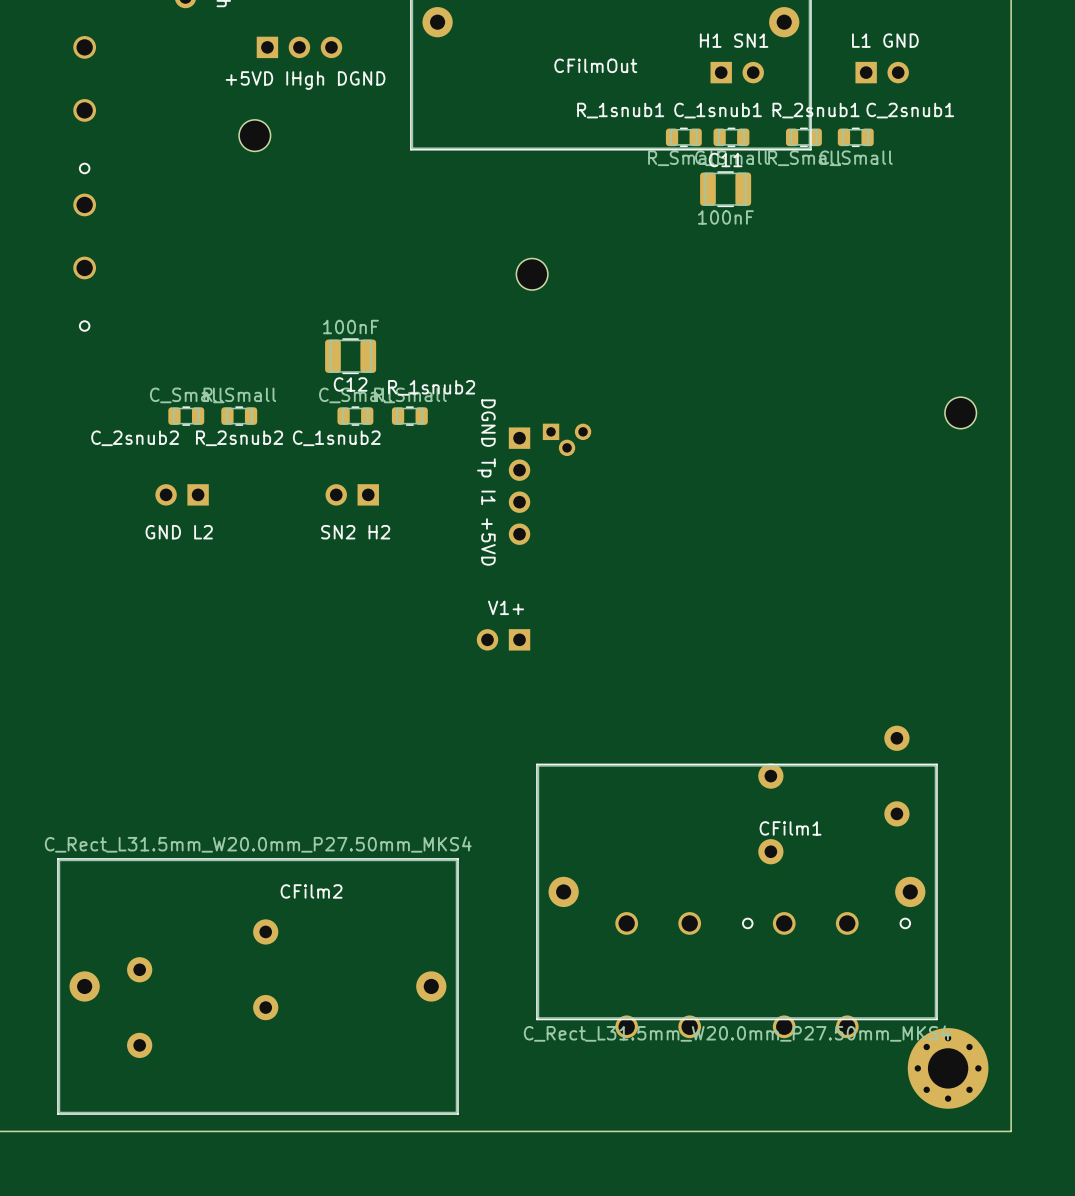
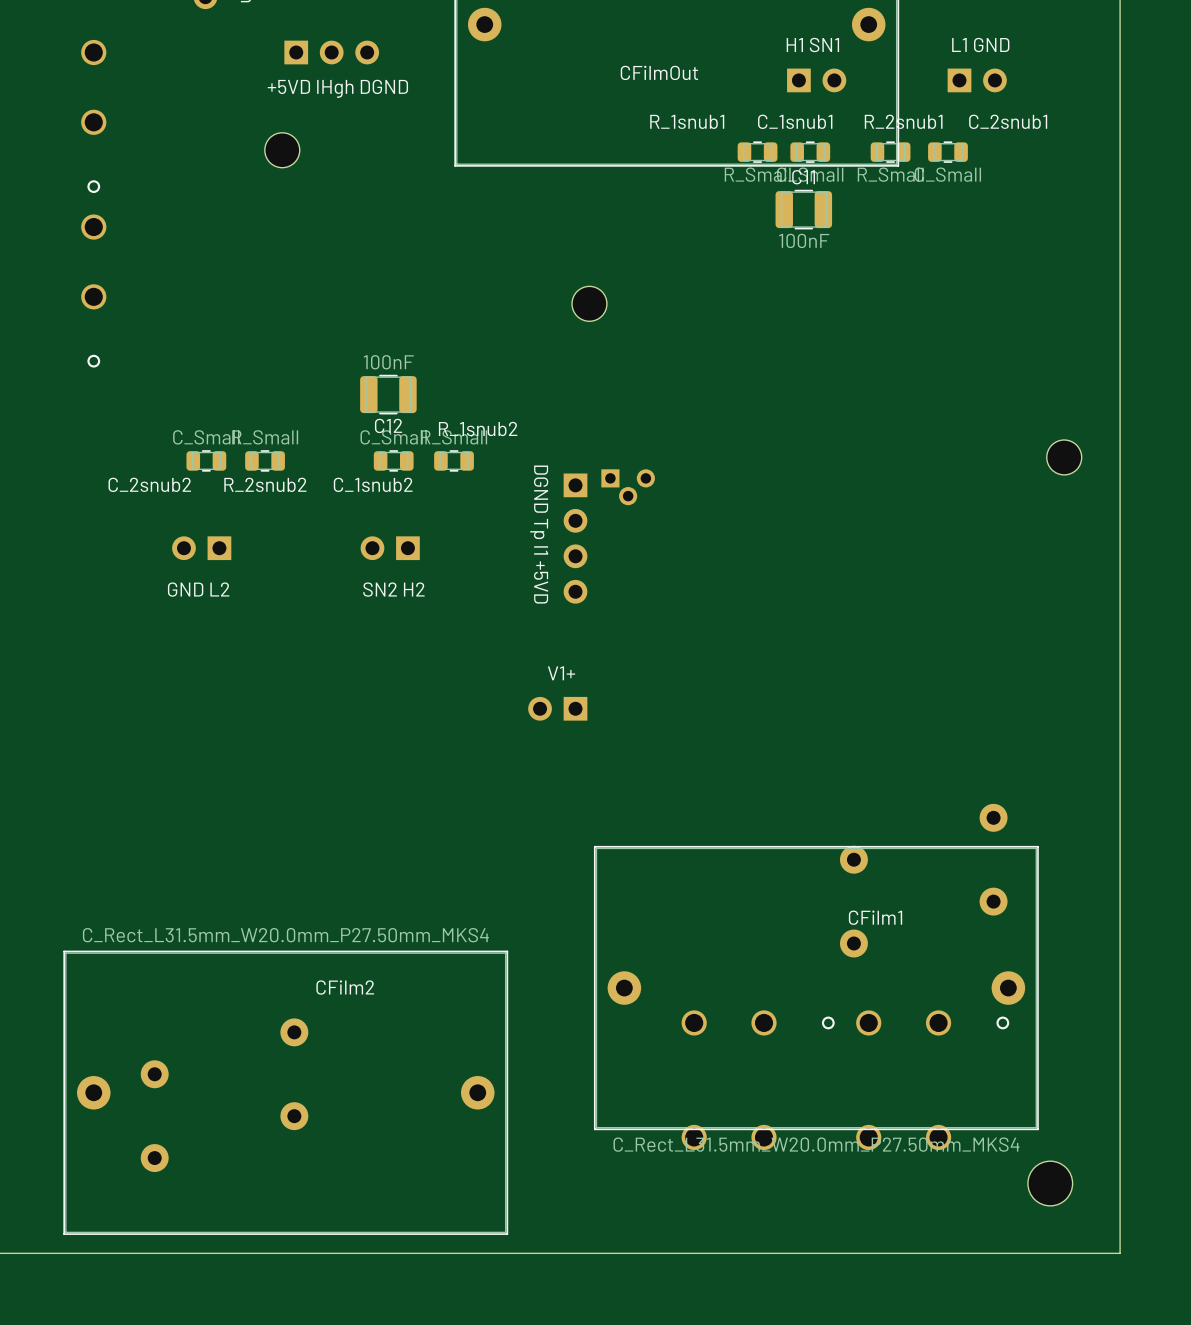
part footprint: [907, 1028, 989, 1109] -> [1027, 1161, 1073, 1206]

